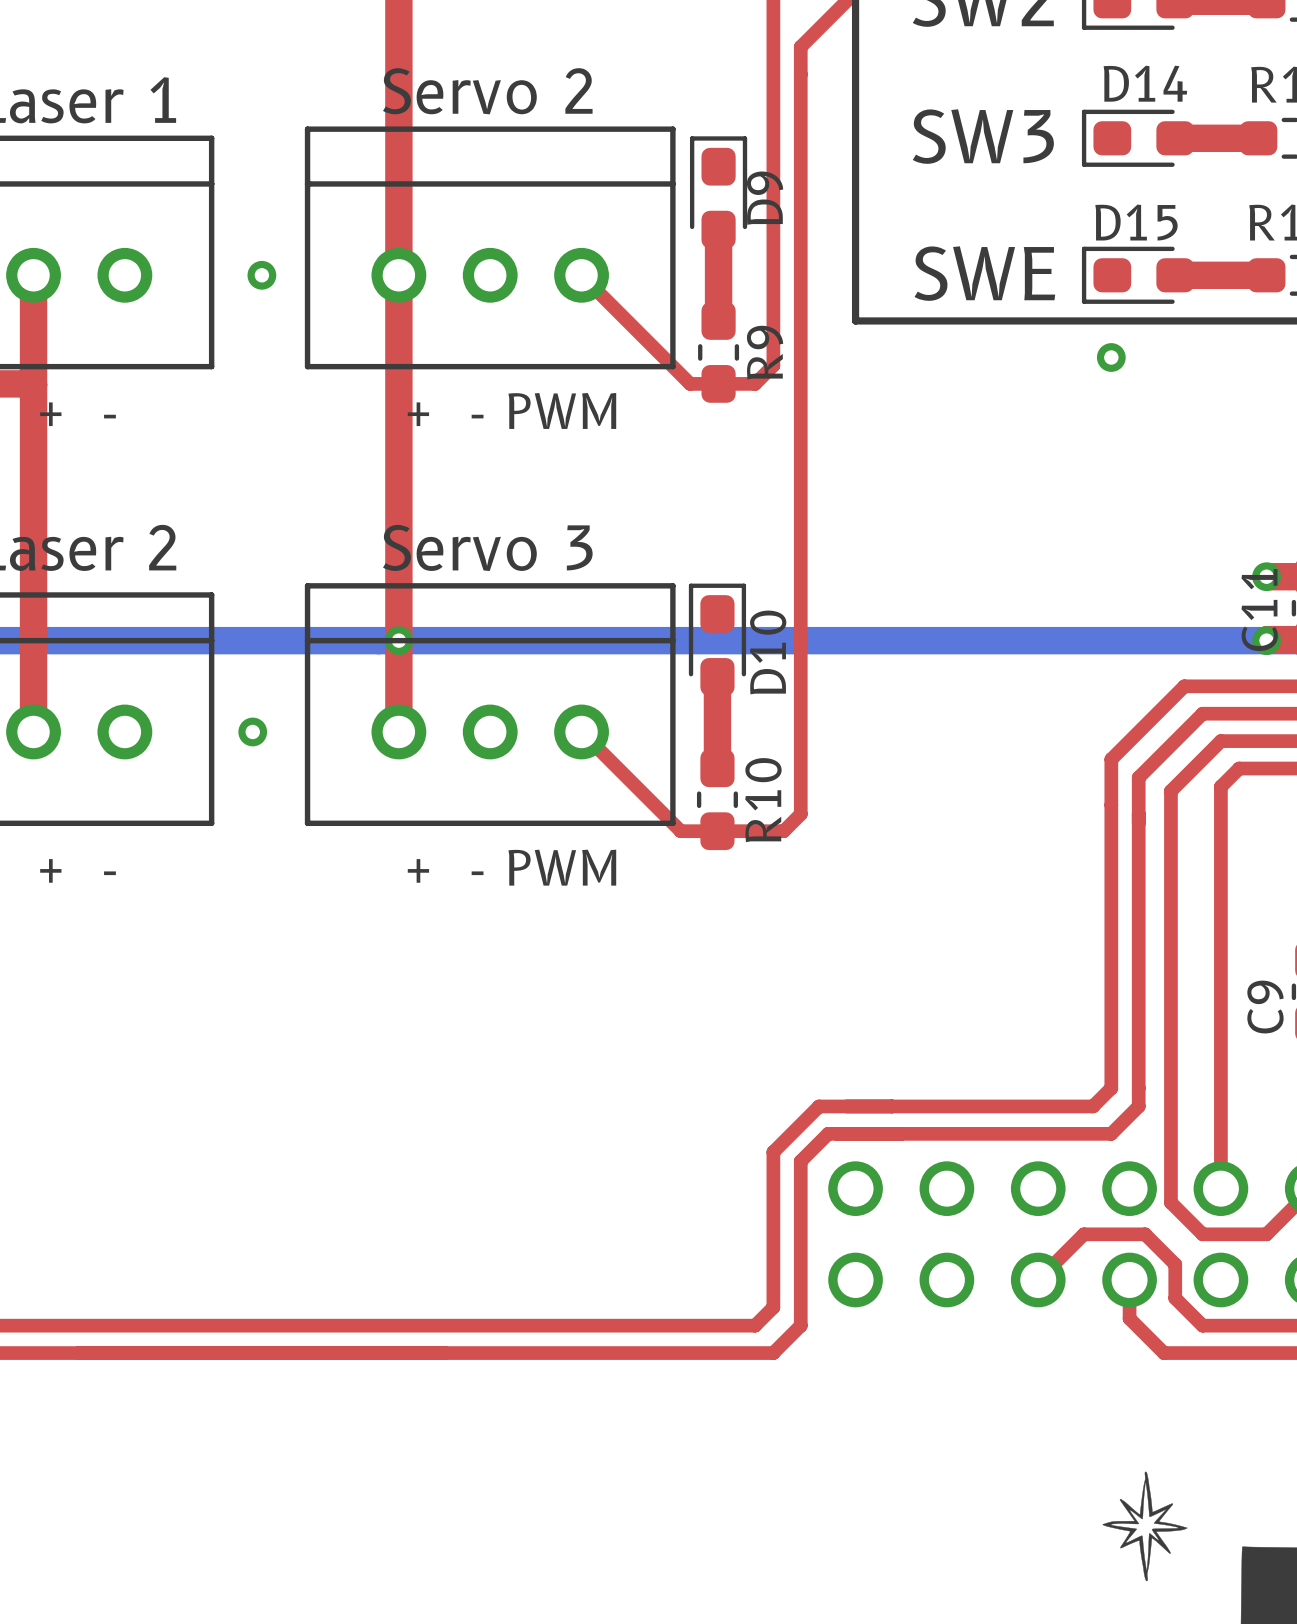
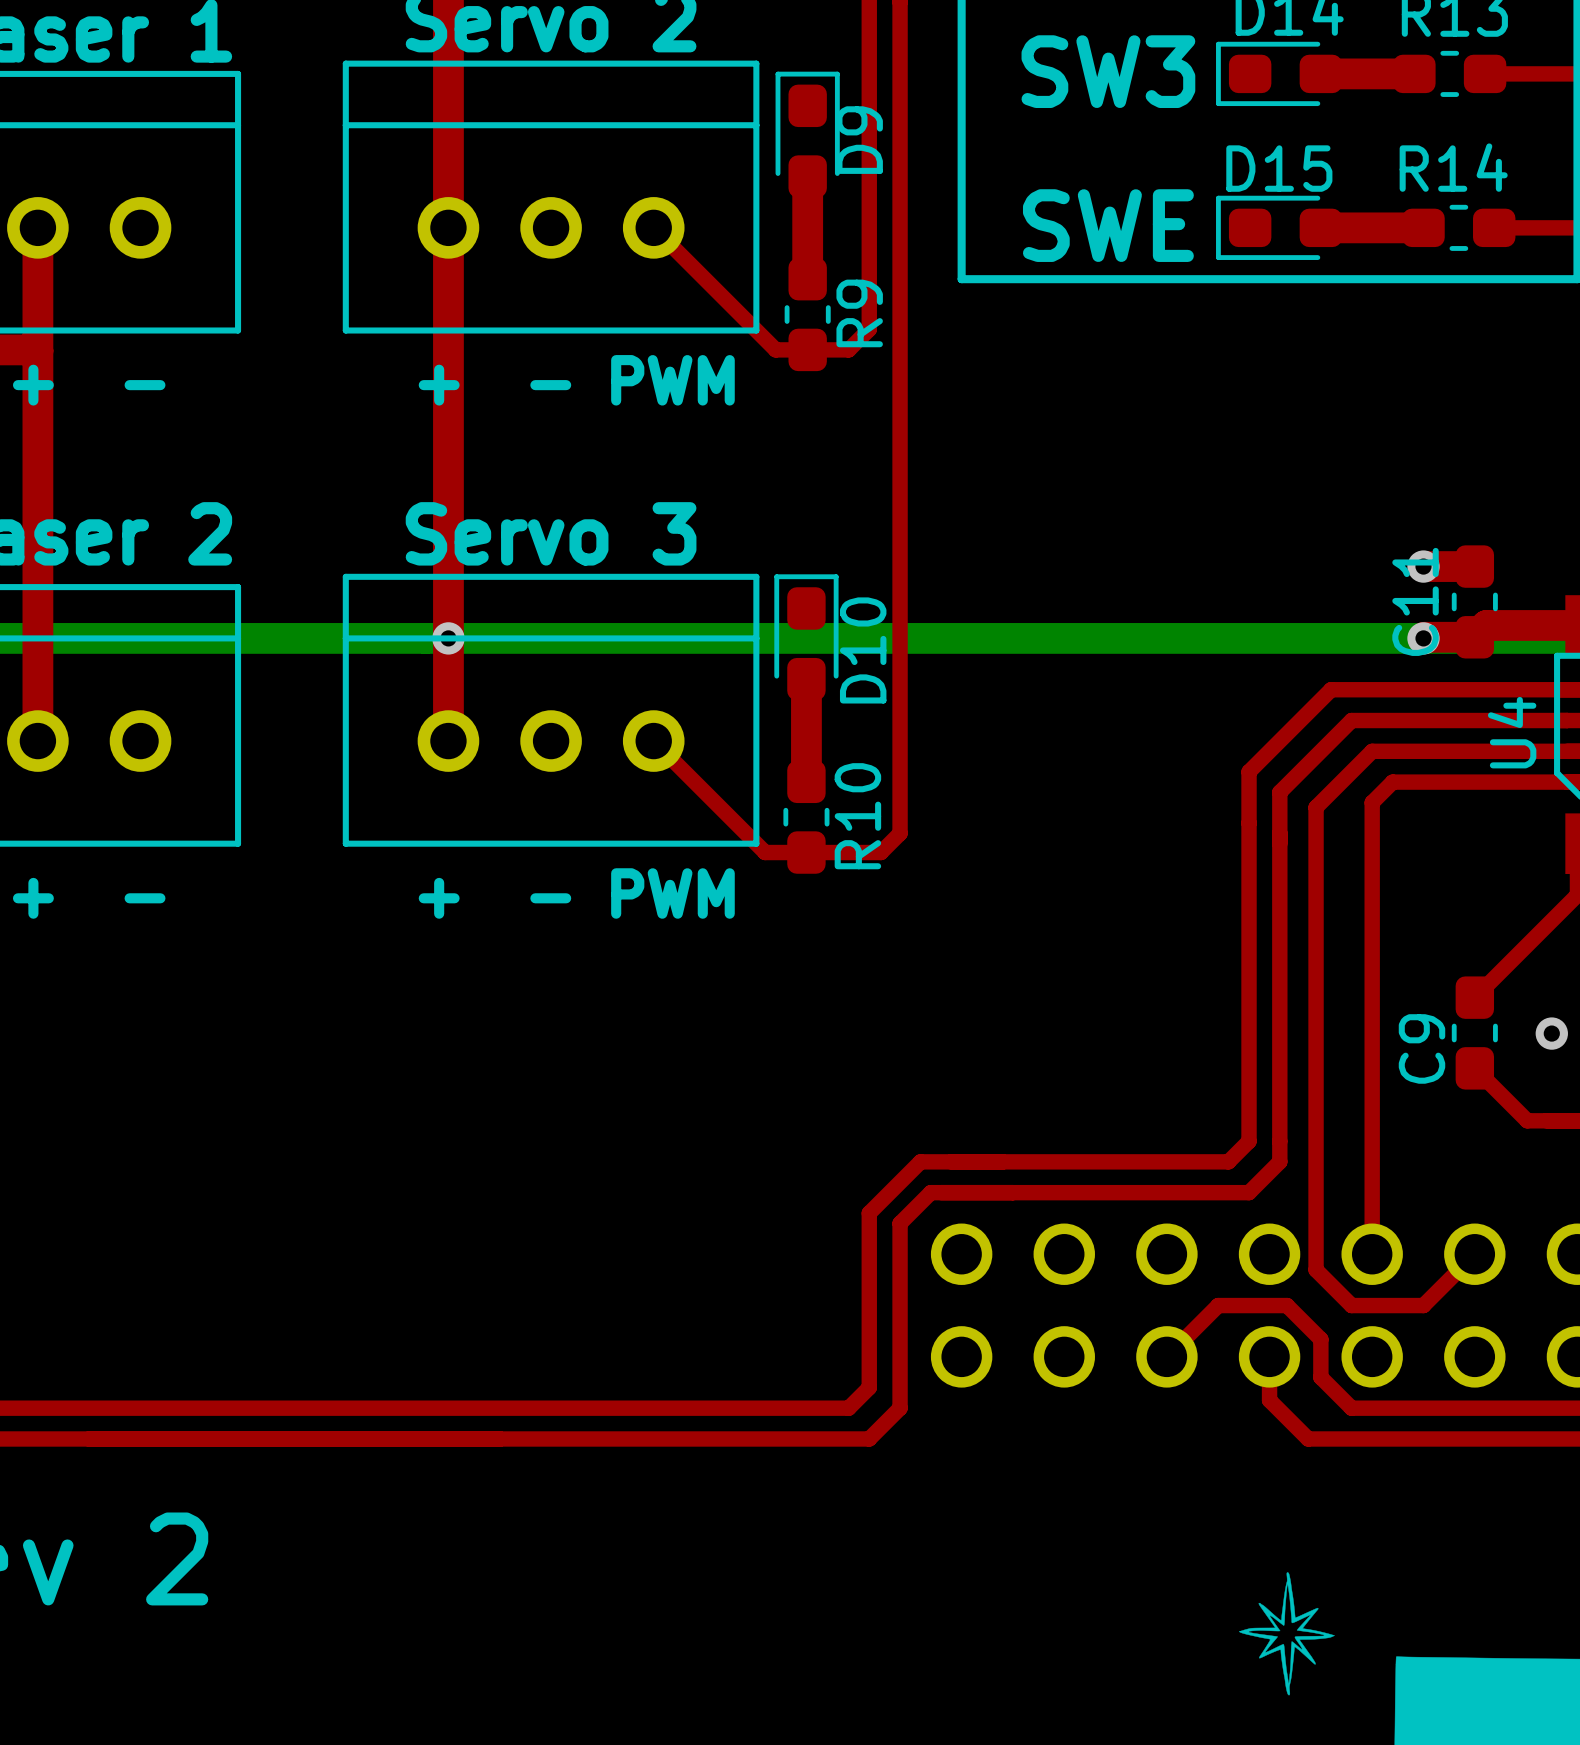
via: (261, 275) -> none
via: (1111, 357) -> none
via: (252, 731) -> none

